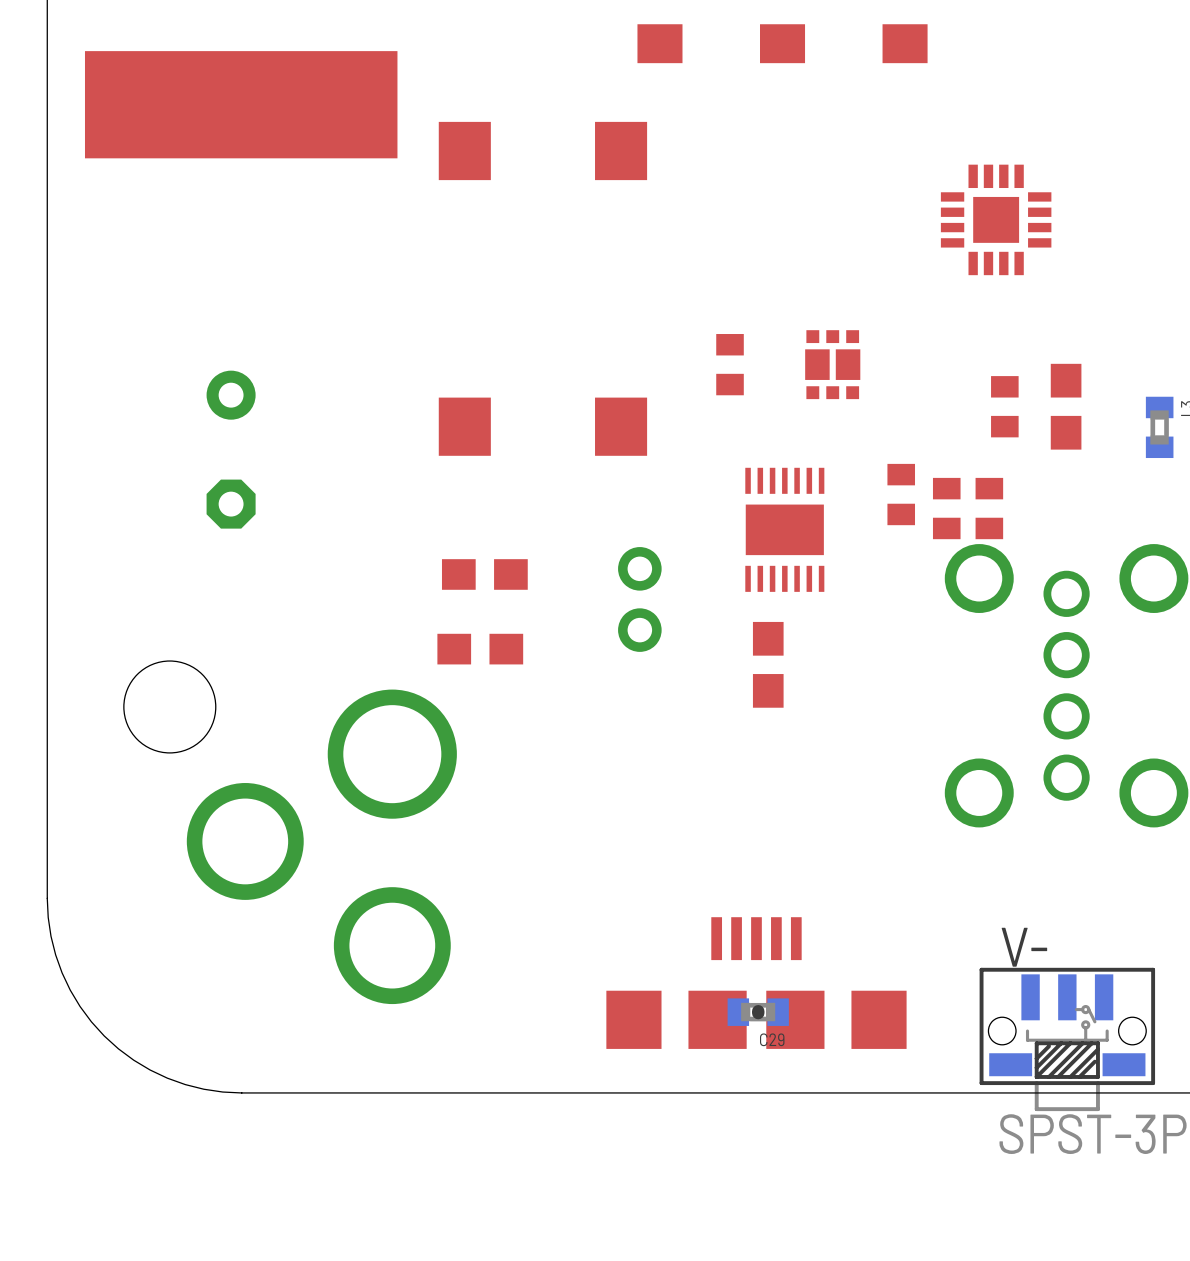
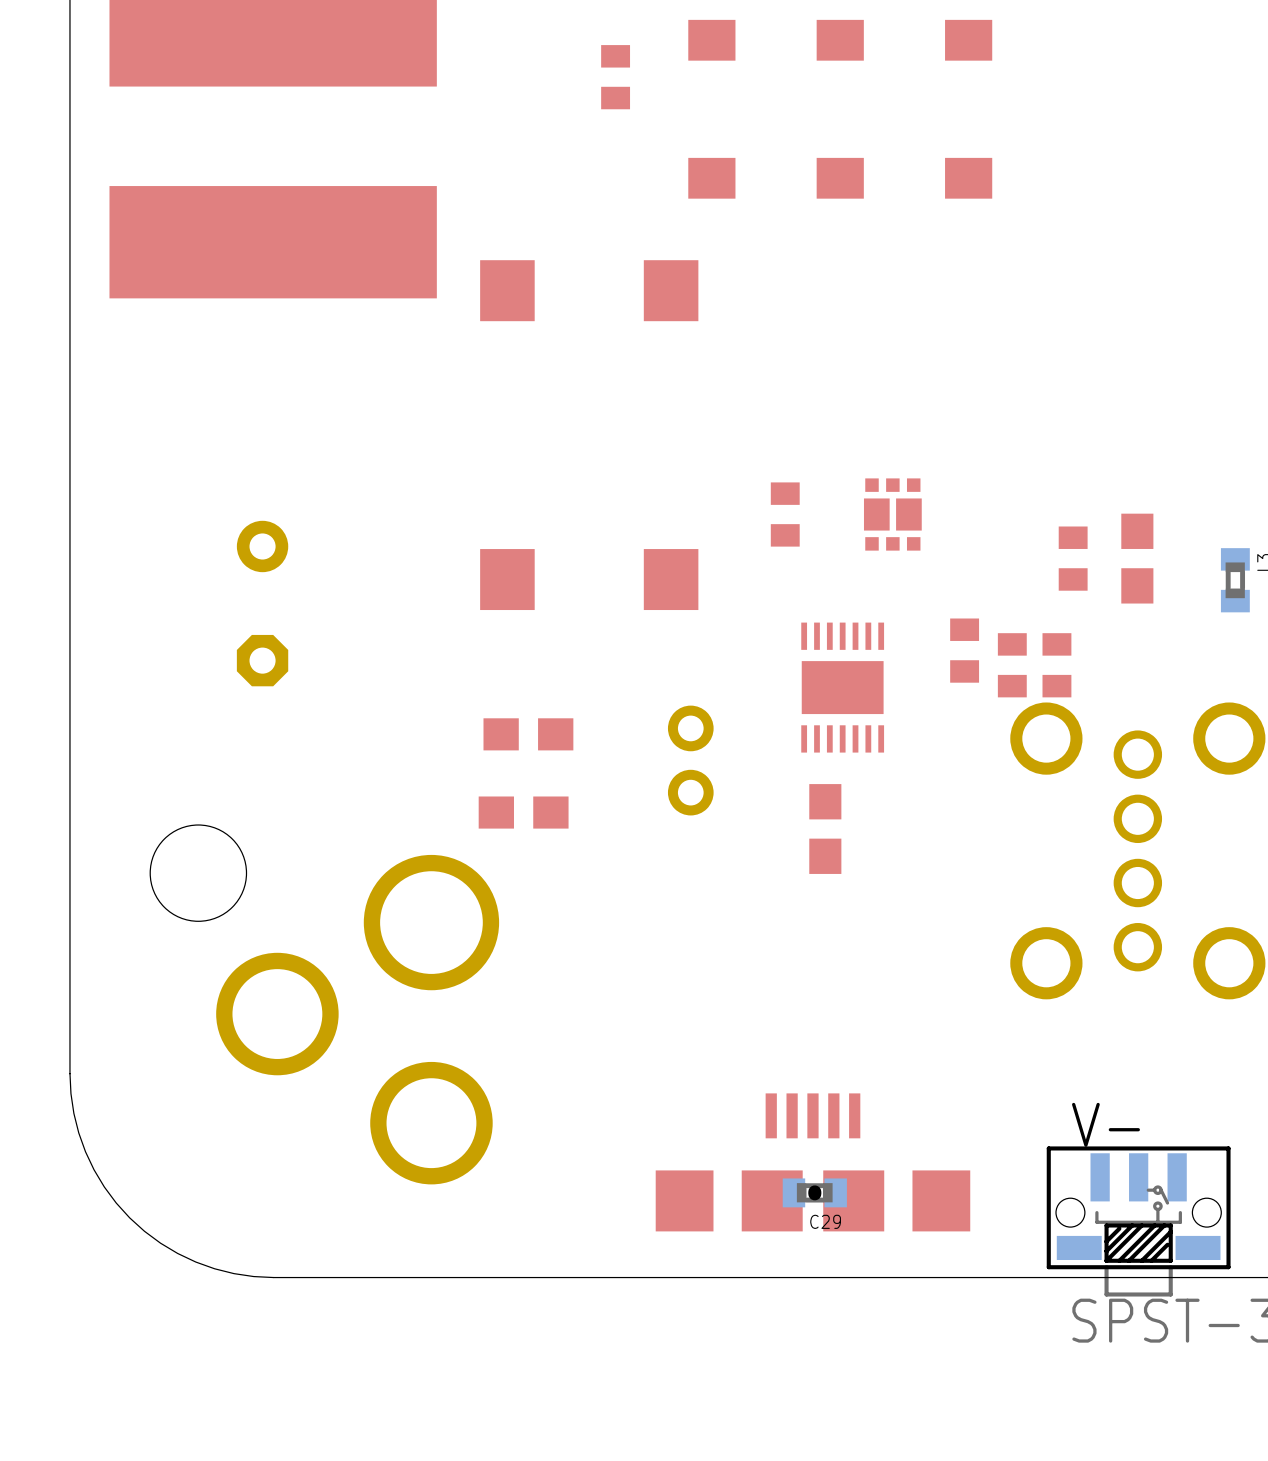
part: (996, 219) -> none

